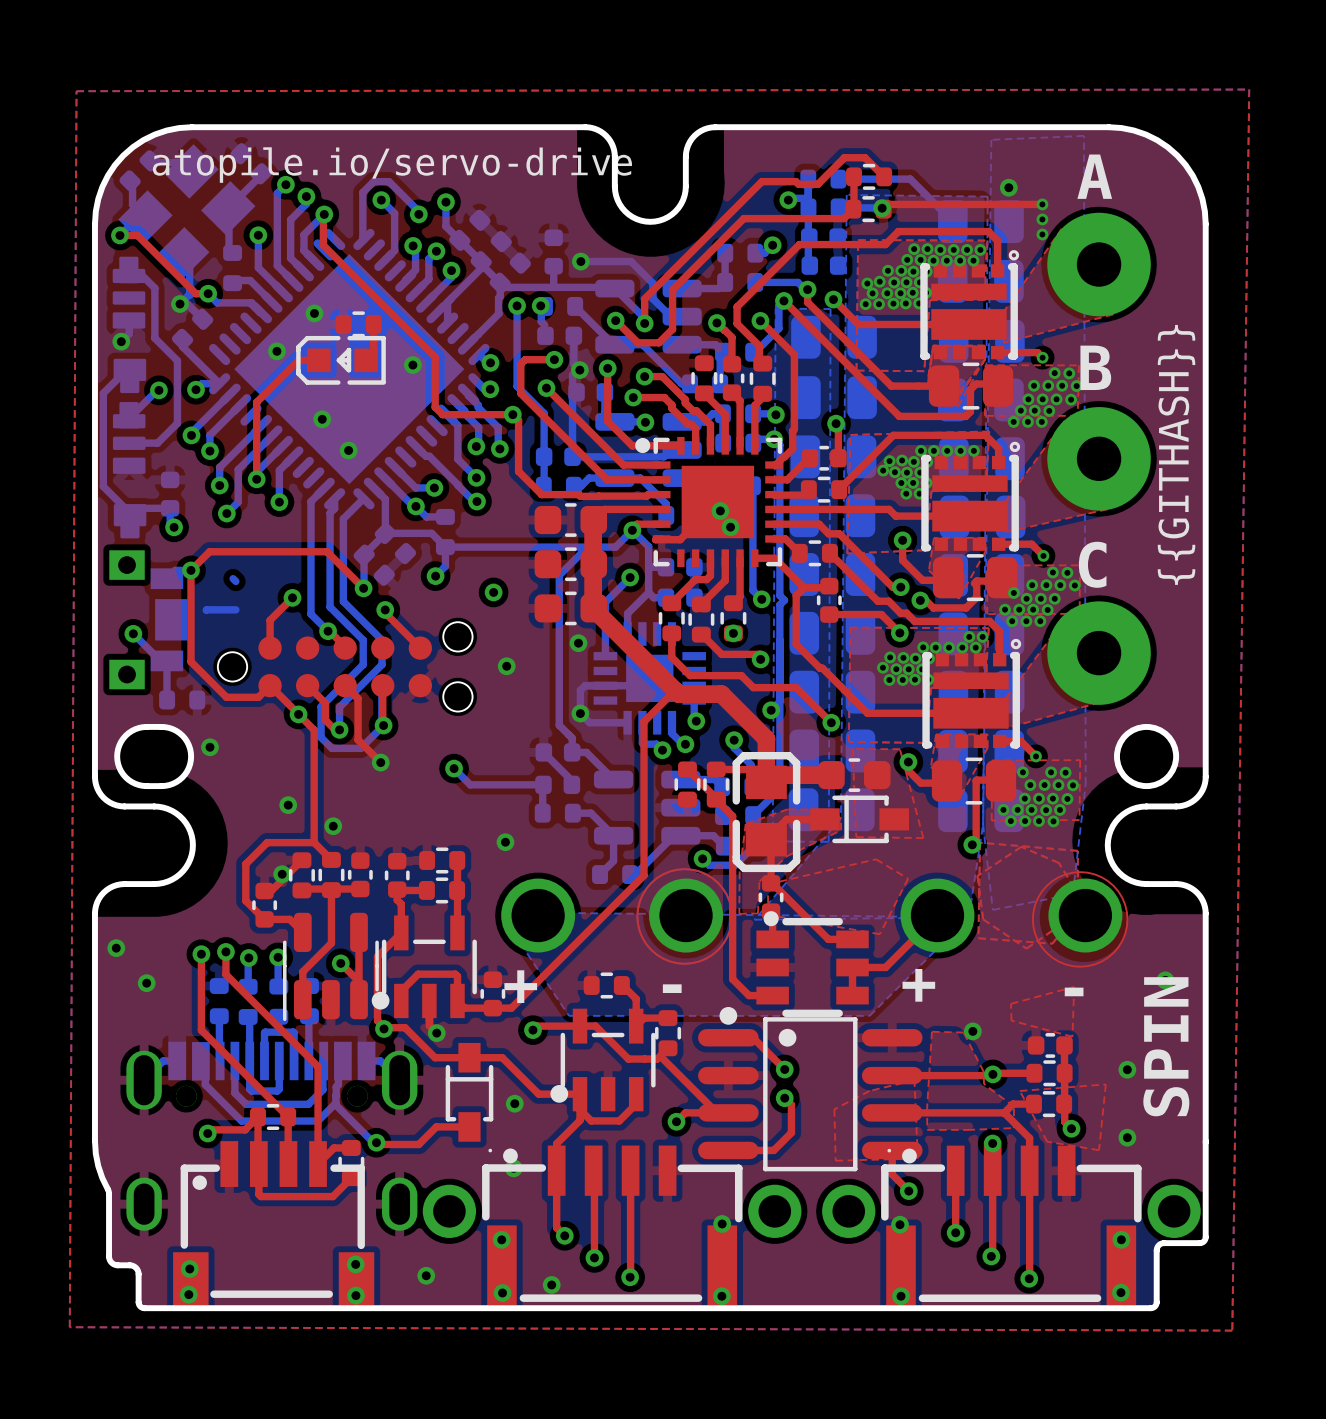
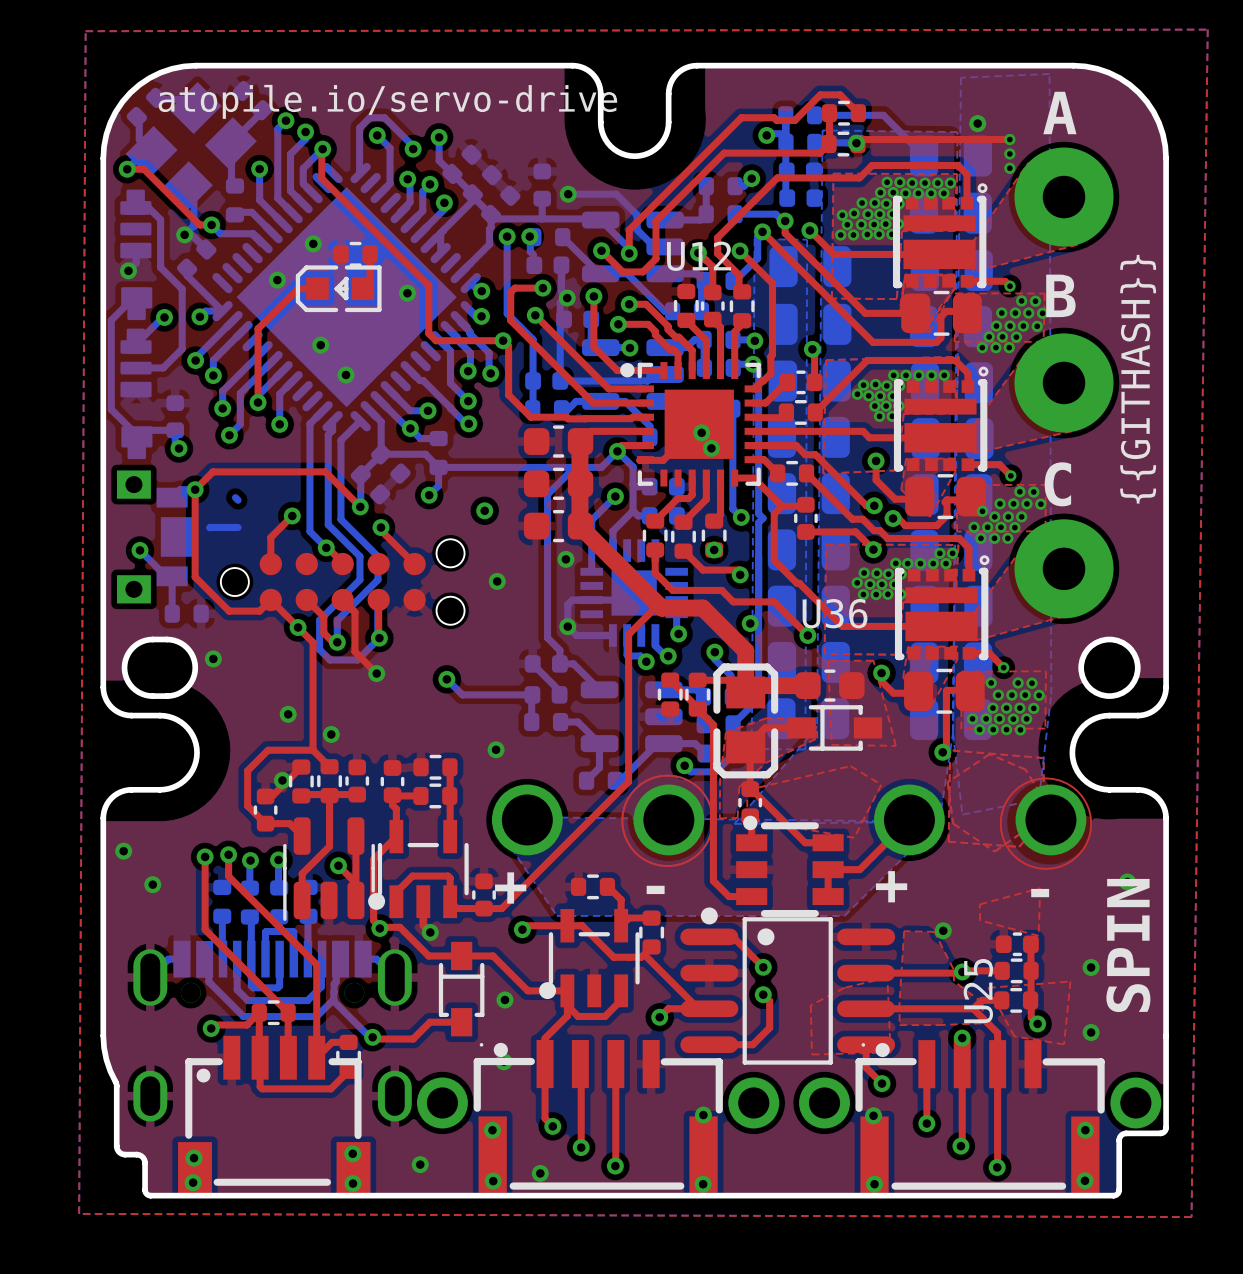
U12 name: none -> U12 (699, 256)
U36 name: none -> U36 (835, 613)
U25 name: none -> U25 (978, 991)

